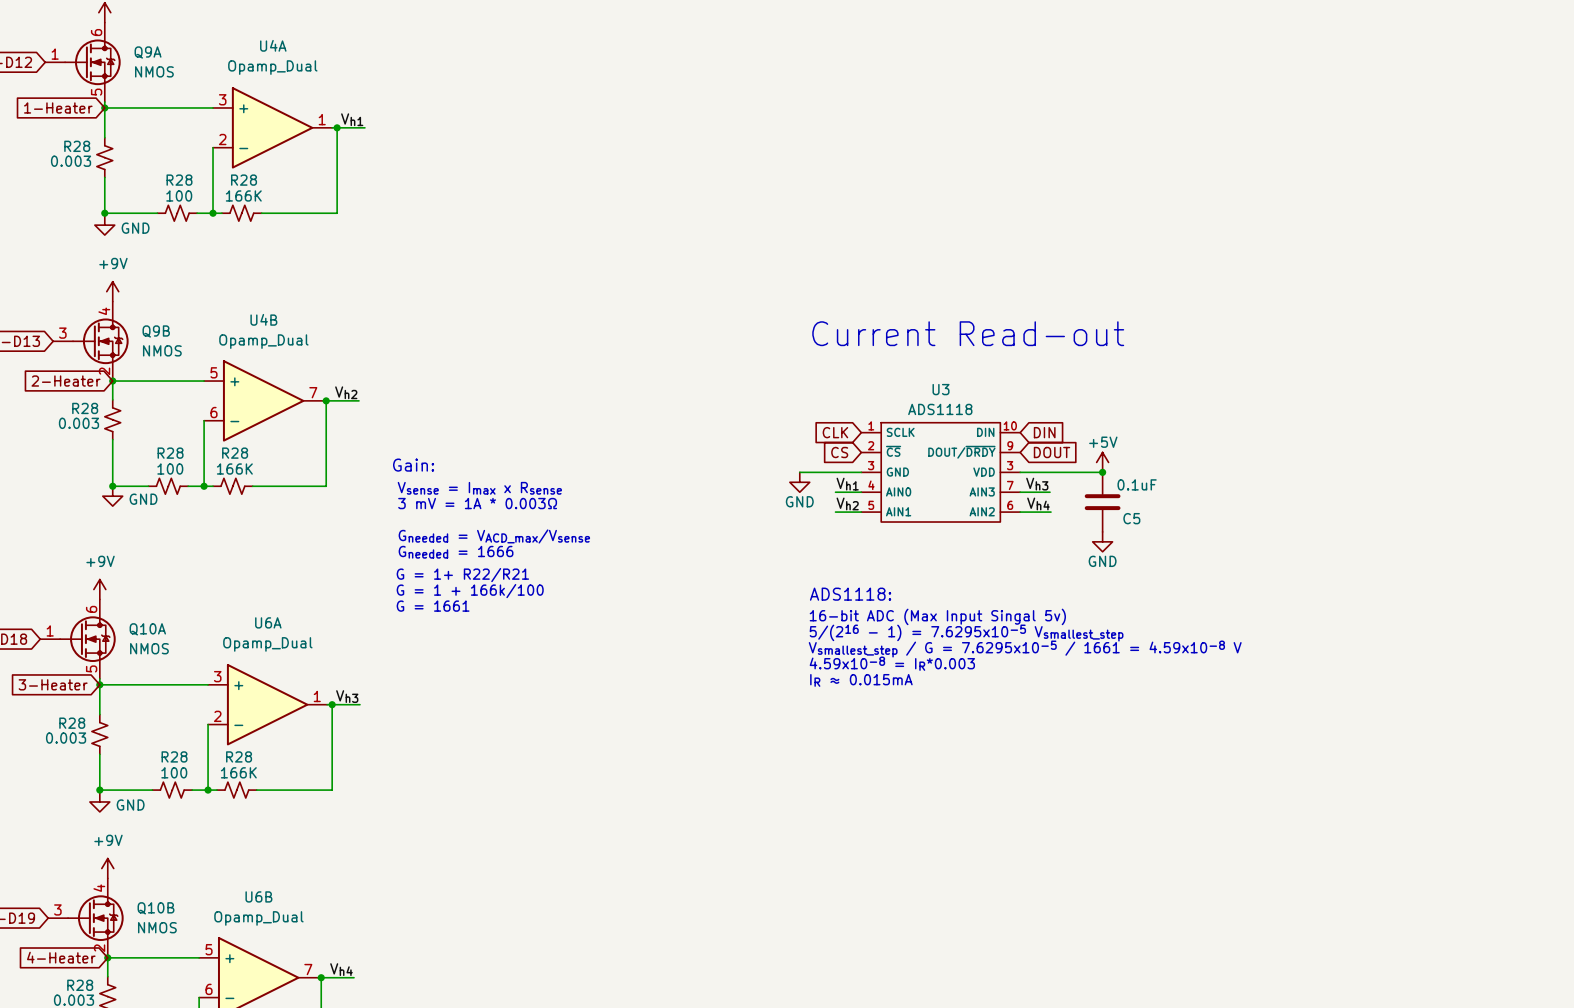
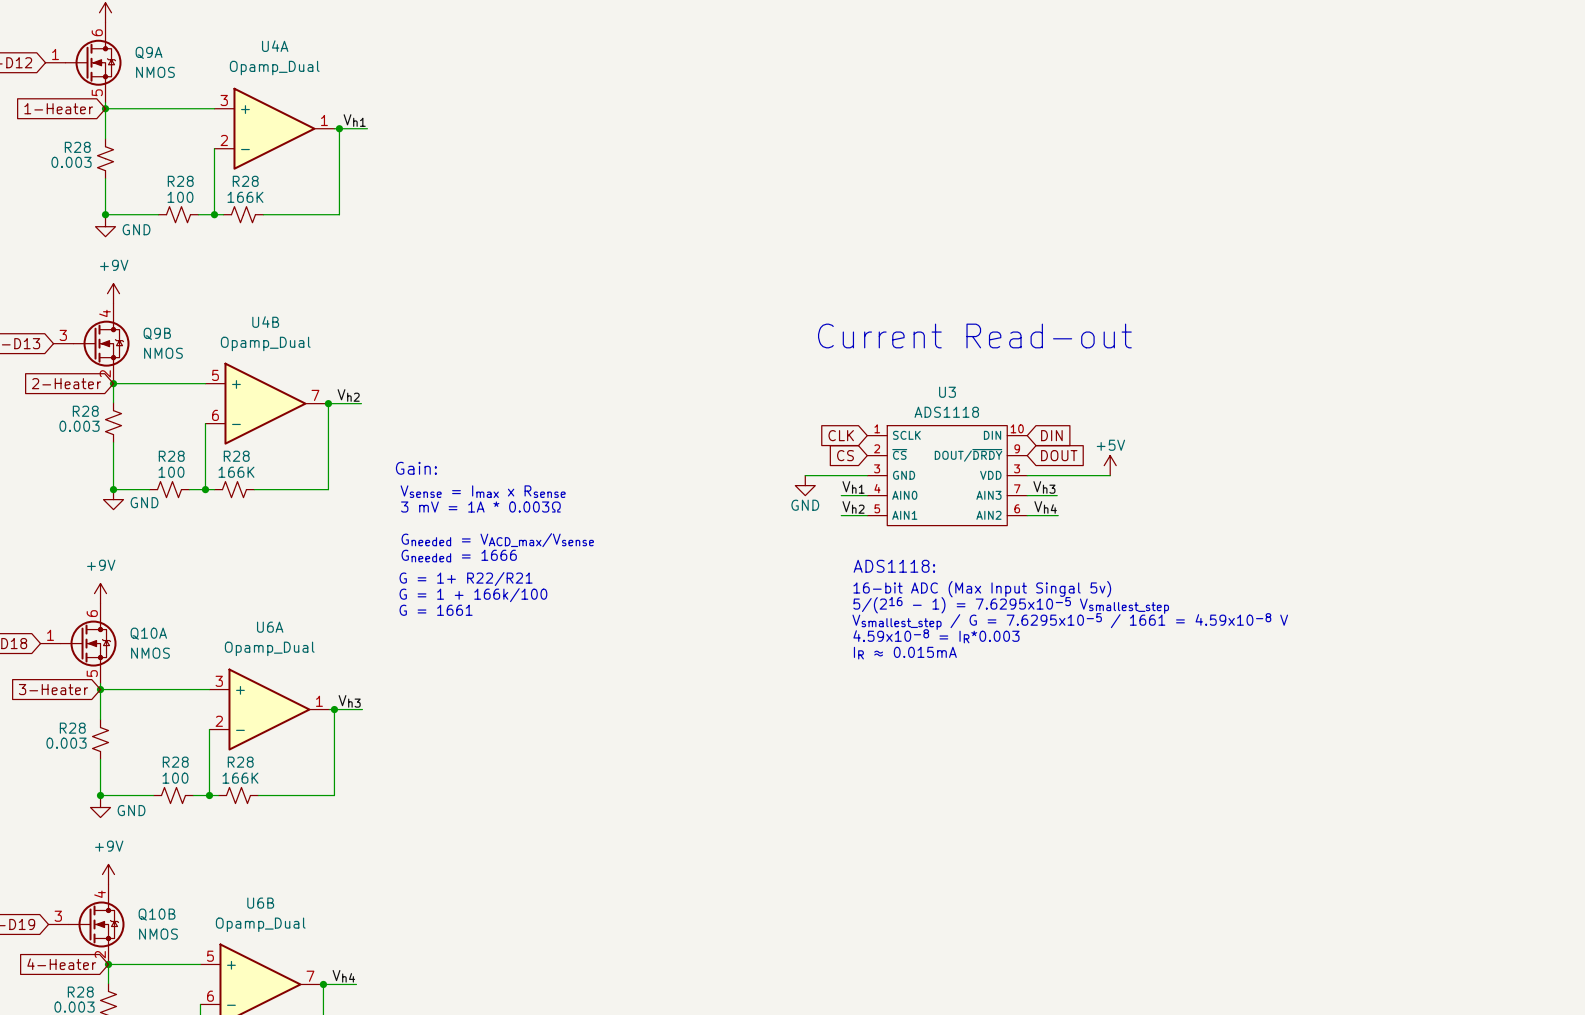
junction: (1102, 472) -> none
C5: 0.1uF (1102, 502) -> none
power symbol: GND (1102, 541) -> none
text position: ADS1118: (850, 594) -> ADS1118: (894, 566)
text position: 16-bit ADC (Max Input Singal 5v) (937, 616) -> 16-bit ADC (Max Input Singal 5v) (982, 589)
text position: 5/(216 - 1) = 7.6295x10-5 Vsmallest_step (966, 633) -> 5/(216 - 1) = 7.6295x10-5 Vsmallest_step (1011, 605)
text position: Vsmallest_step / G = 7.6295x10-5 / 1661 = 4.59x10-8 V (1025, 649) -> Vsmallest_step / G = 7.6295x10-5 / 1661 = 4.59x10-8 V (1070, 621)
text position: 4.59x10-8 = IR*0.003 (892, 663) -> 4.59x10-8 = IR*0.003 (936, 636)
text position: IR ≈ 0.015mA (861, 680) -> IR ≈ 0.015mA (905, 653)

